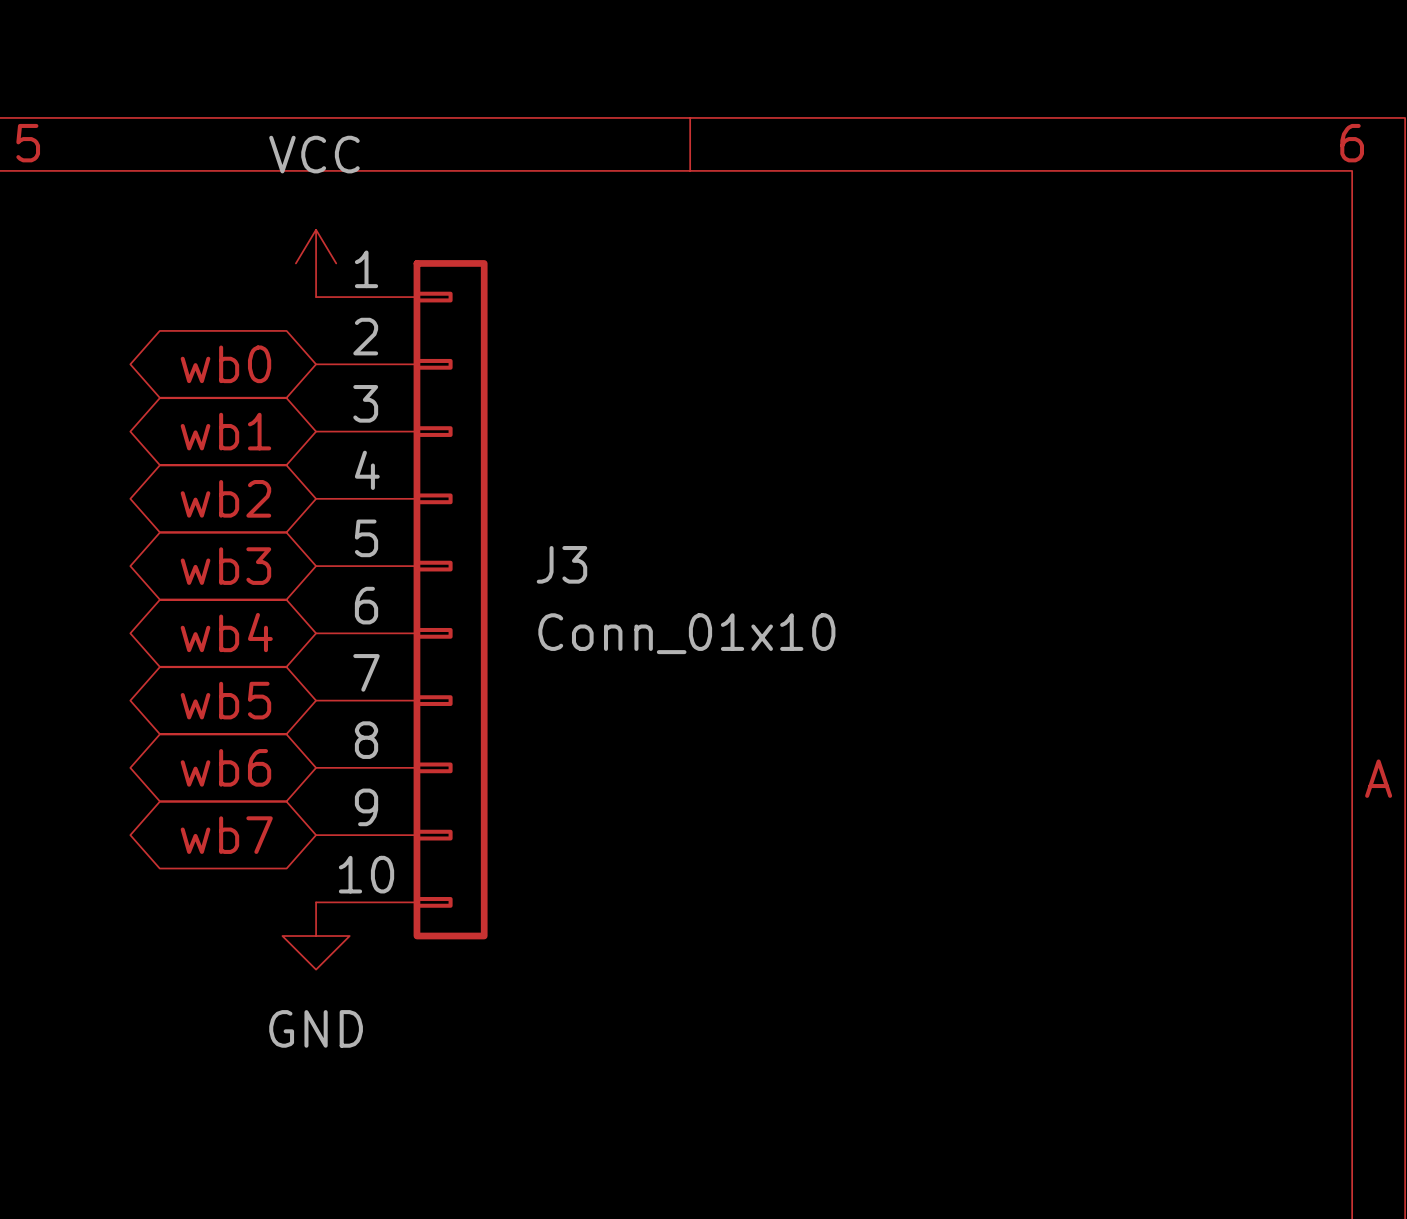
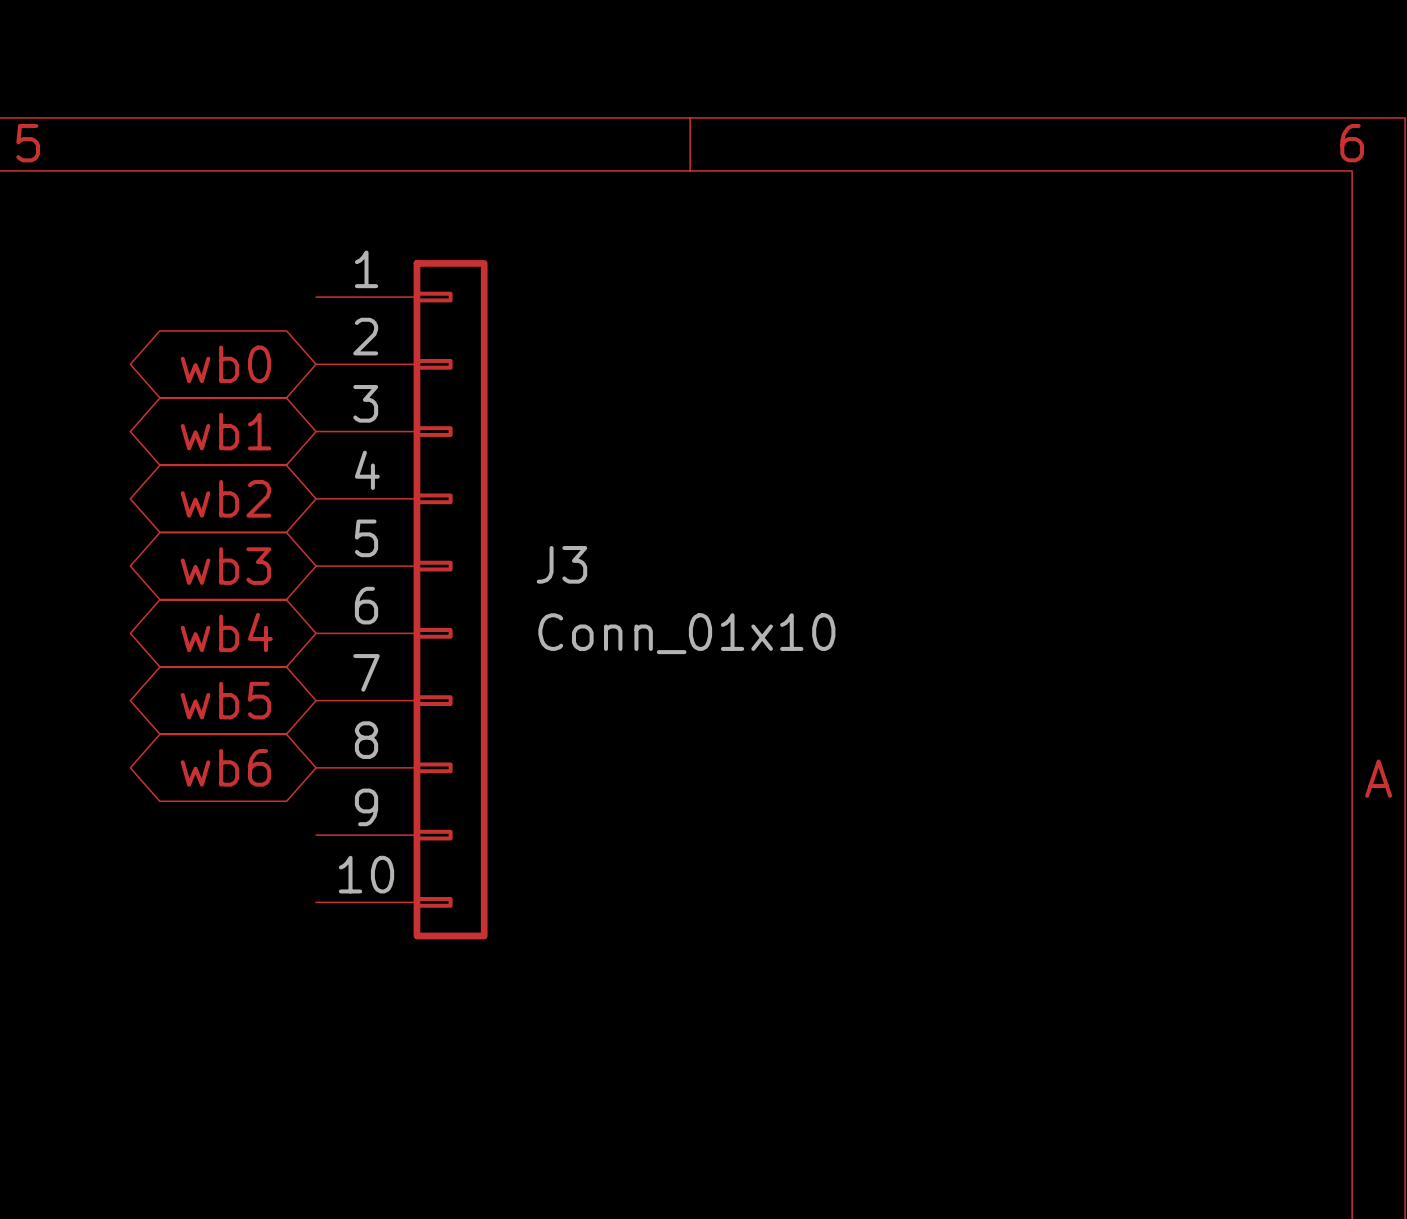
power symbol: VCC (316, 263) -> none
global label: wb7 (226, 835) -> none
power symbol: GND (316, 936) -> none

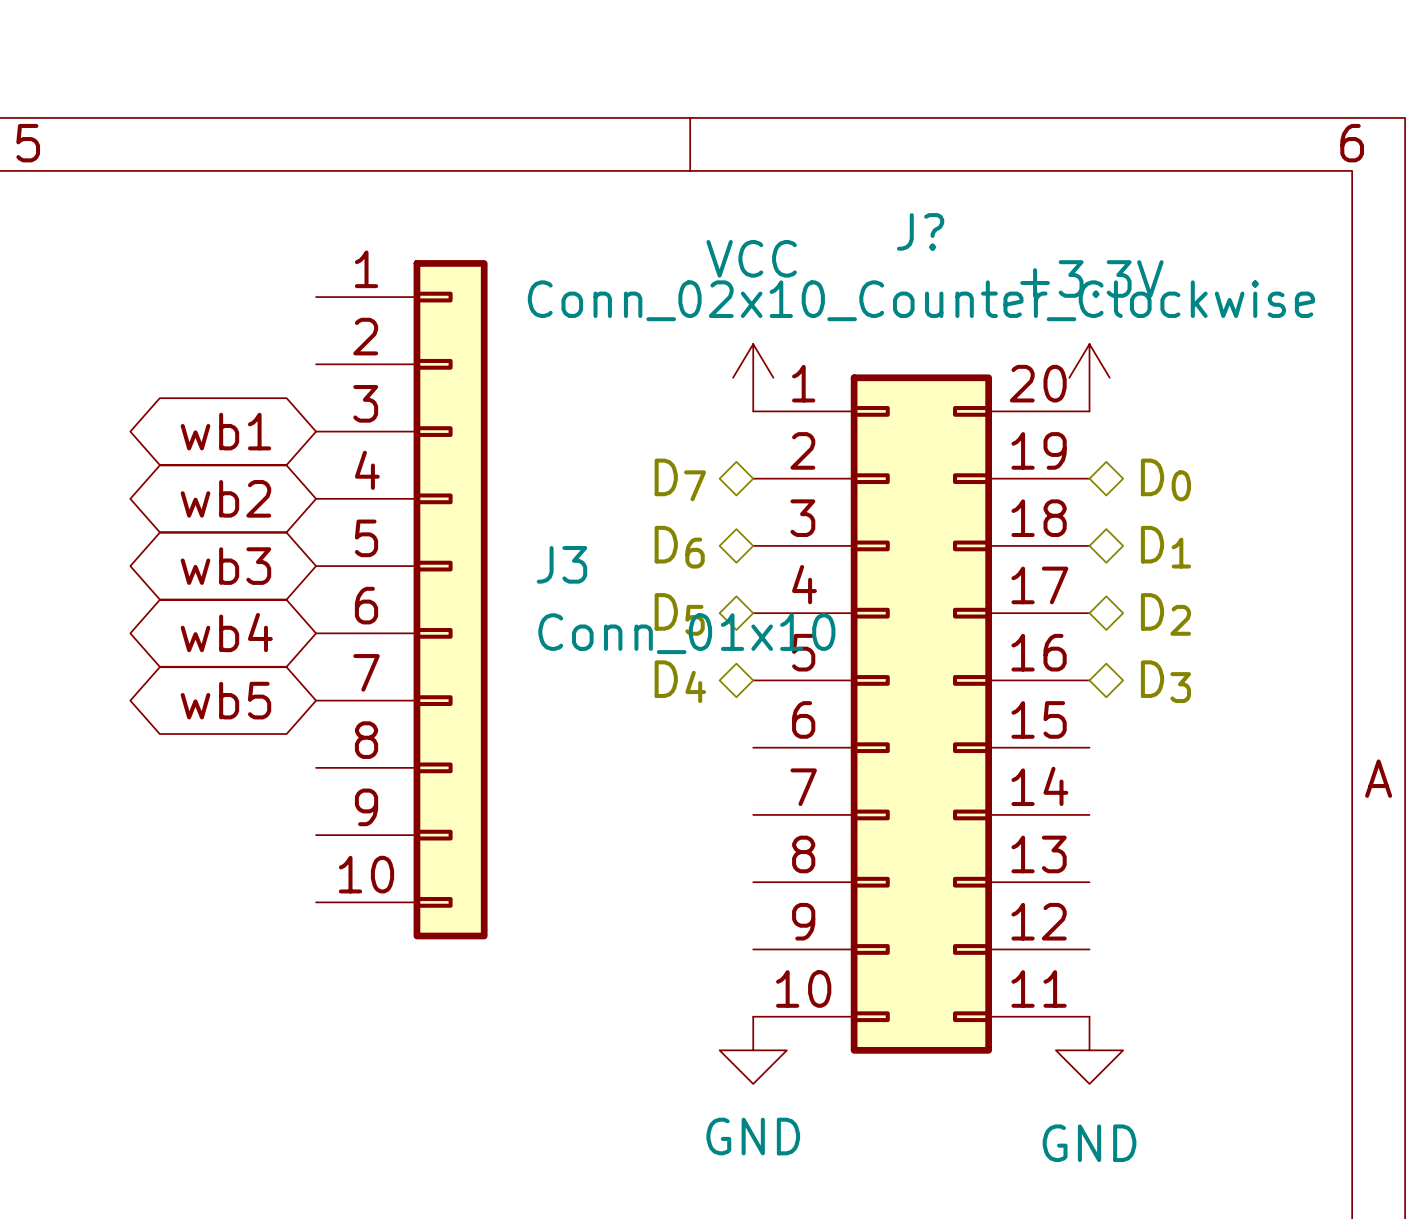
global label: wb0 (225, 364) -> none
power symbol: none -> VCC (753, 377)
power symbol: none -> +3.3V (1089, 377)
hierarchical label: none -> D7 (680, 479)
hierarchical label: none -> D0 (1165, 479)
hierarchical label: none -> D6 (679, 547)
hierarchical label: none -> D1 (1165, 547)
hierarchical label: none -> D5 (679, 614)
hierarchical label: none -> D2 (1165, 614)
hierarchical label: none -> D4 (680, 681)
hierarchical label: none -> D3 (1165, 681)
J?: none -> Conn_02x10_Counter_Clockwise (921, 714)
global label: wb6 (225, 767) -> none
power symbol: none -> GND (753, 1050)
power symbol: none -> GND (1089, 1050)

